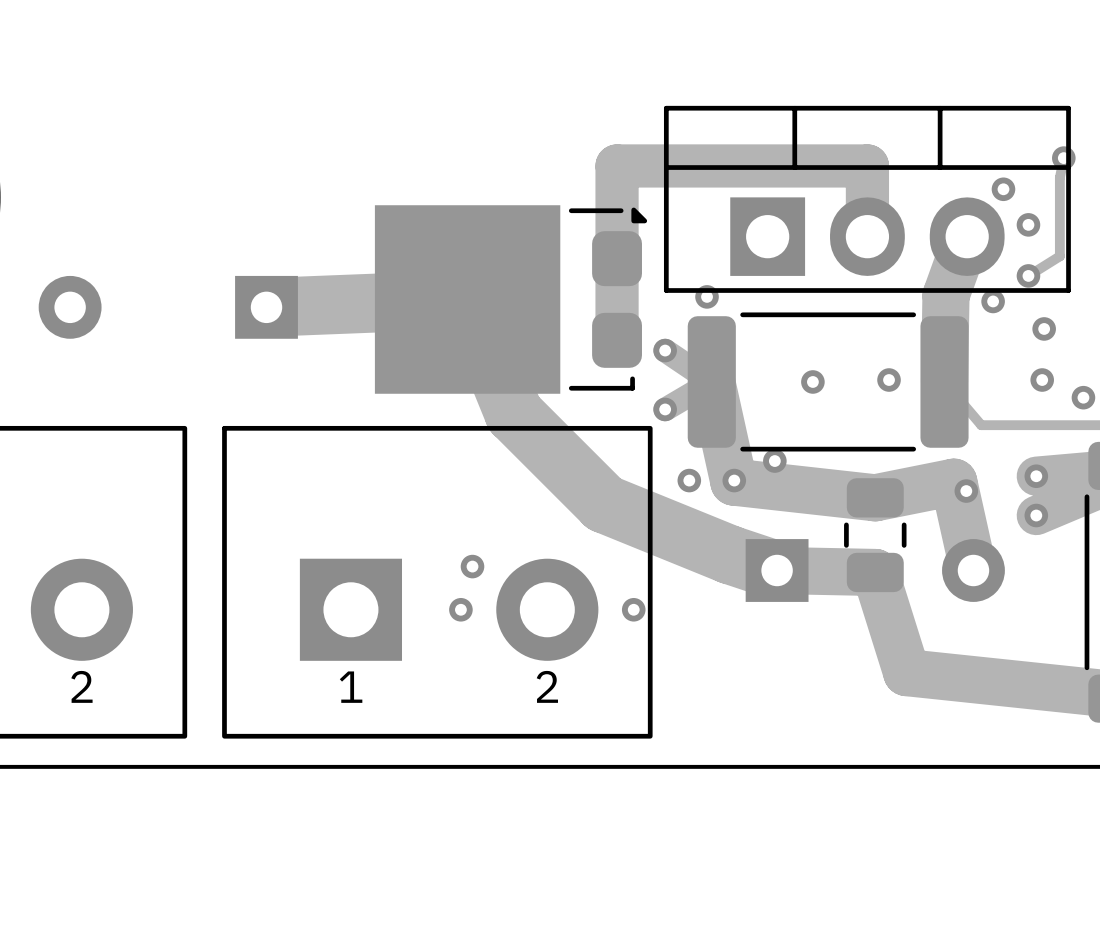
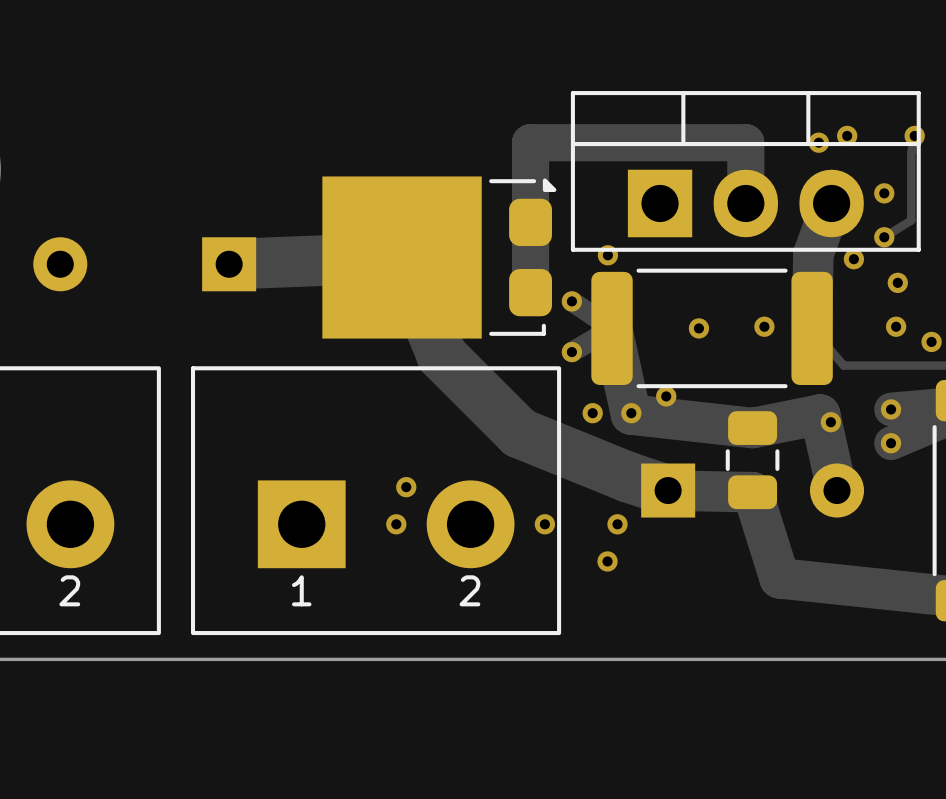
via: none -> (847, 135)
via: none -> (818, 142)
via: (1003, 189) -> none
via: none -> (617, 524)
via: none -> (607, 561)

